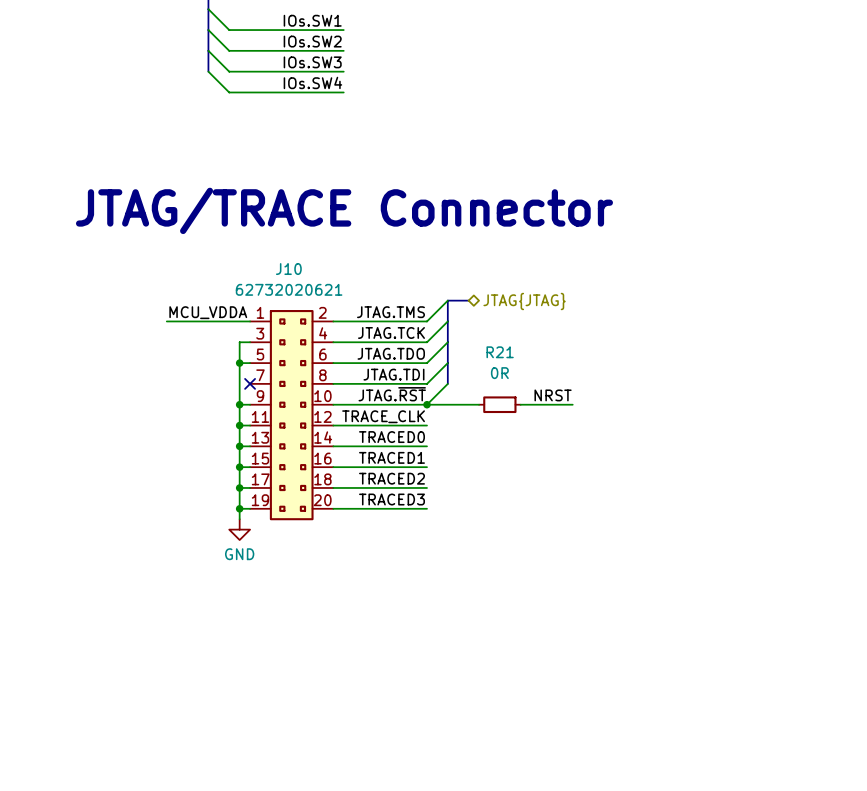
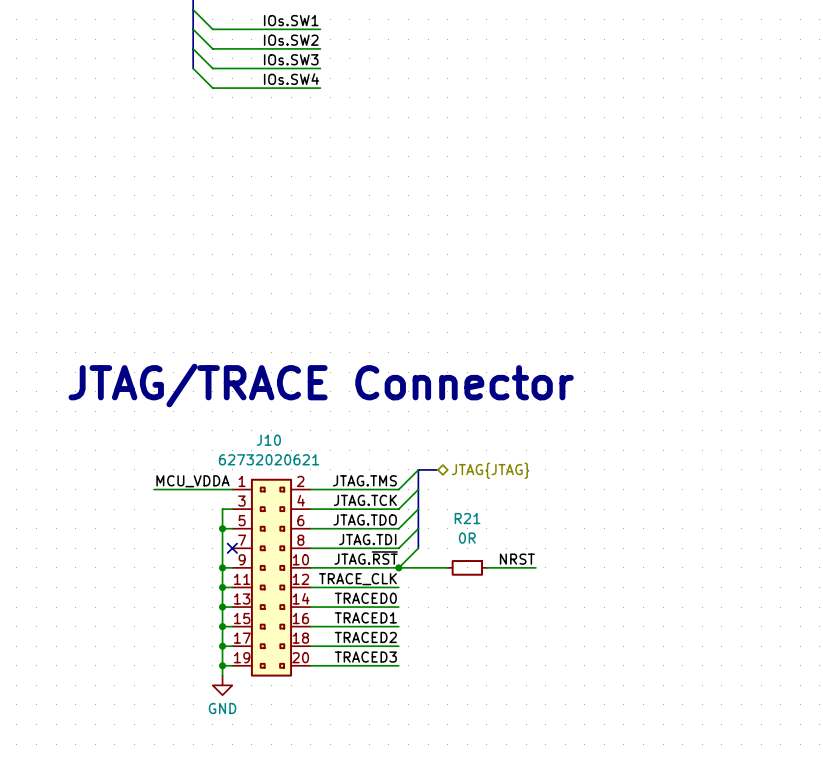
text position: JTAG/TRACE Connector (344, 210) -> JTAG/TRACE Connector (321, 385)
wire: (447, 300) (427, 321) (333, 321) -> (418, 469) (398, 489) (310, 489)
bus: (468, 300) (447, 300) (447, 383) -> (437, 469) (418, 469) (418, 548)
hierarchical label position: JTAG{JTAG} (524, 301) -> JTAG{JTAG} (490, 470)
label position: MCU_VDDA (208, 312) -> MCU_VDDA (193, 481)
label position: JTAG.TMS (390, 312) -> JTAG.TMS (364, 480)
wire: (166, 321) (250, 321) -> (154, 489) (232, 489)
wire: (447, 321) (427, 342) (333, 342) -> (418, 489) (398, 509) (310, 509)
label position: JTAG.TCK (391, 332) -> JTAG.TCK (365, 500)
wire: (250, 342) (239, 342) (239, 519) -> (232, 509) (222, 509) (222, 675)
wire: (447, 342) (427, 363) (333, 363) -> (418, 509) (398, 528) (310, 528)
label position: JTAG.TDO (391, 353) -> JTAG.TDO (365, 519)
wire: (239, 363) (250, 363) -> (222, 528) (232, 528)
junction: (239, 363) -> none
wire: (447, 363) (427, 383) (333, 383) -> (418, 528) (398, 548) (310, 548)
label position: JTAG.TDI (393, 374) -> JTAG.TDI (367, 539)
no-connect mark: (250, 383) -> none
wire: (447, 383) (427, 404) -> (418, 548) (398, 567)
label position: JTAG.~{RST} (392, 394) -> JTAG.~{RST} (366, 558)
label position: NRST (553, 395) -> NRST (517, 559)
junction: (239, 404) -> none
wire: (333, 404) (479, 404) -> (310, 567) (447, 567)
junction: (427, 404) -> none
R21 position: (499, 404) -> (467, 567)
wire: (520, 404) (572, 404) -> (486, 567) (535, 567)
J10 position: (291, 415) -> (271, 577)
label position: TRACE_CLK (383, 416) -> TRACE_CLK (357, 579)
wire: (239, 425) (250, 425) -> (222, 587) (232, 587)
junction: (239, 425) -> none
wire: (333, 425) (427, 425) -> (310, 587) (398, 587)
label position: TRACED0 (391, 437) -> TRACED0 (365, 598)
wire: (239, 446) (250, 446) -> (222, 607) (232, 607)
junction: (239, 446) -> none
wire: (333, 446) (427, 446) -> (310, 607) (398, 607)
label position: TRACED1 (391, 457) -> TRACED1 (365, 617)
wire: (239, 467) (250, 467) -> (222, 626) (232, 626)
junction: (239, 467) -> none
wire: (333, 467) (427, 467) -> (310, 626) (398, 626)
label position: TRACED2 (391, 478) -> TRACED2 (365, 637)
wire: (239, 487) (250, 487) -> (222, 646) (232, 646)
junction: (239, 487) -> none
wire: (333, 487) (427, 487) -> (310, 646) (398, 646)
label position: TRACED3 (391, 499) -> TRACED3 (365, 657)
wire: (239, 508) (250, 508) -> (222, 665) (232, 665)
junction: (239, 508) -> none
wire: (333, 508) (427, 508) -> (310, 665) (398, 665)
power symbol position: GND (239, 529) -> GND (222, 685)
junction: none -> (222, 528)
no-connect mark: none -> (232, 548)
junction: none -> (222, 567)
junction: none -> (398, 567)
junction: none -> (222, 587)
junction: none -> (222, 607)
junction: none -> (222, 626)
junction: none -> (222, 646)
junction: none -> (222, 665)

